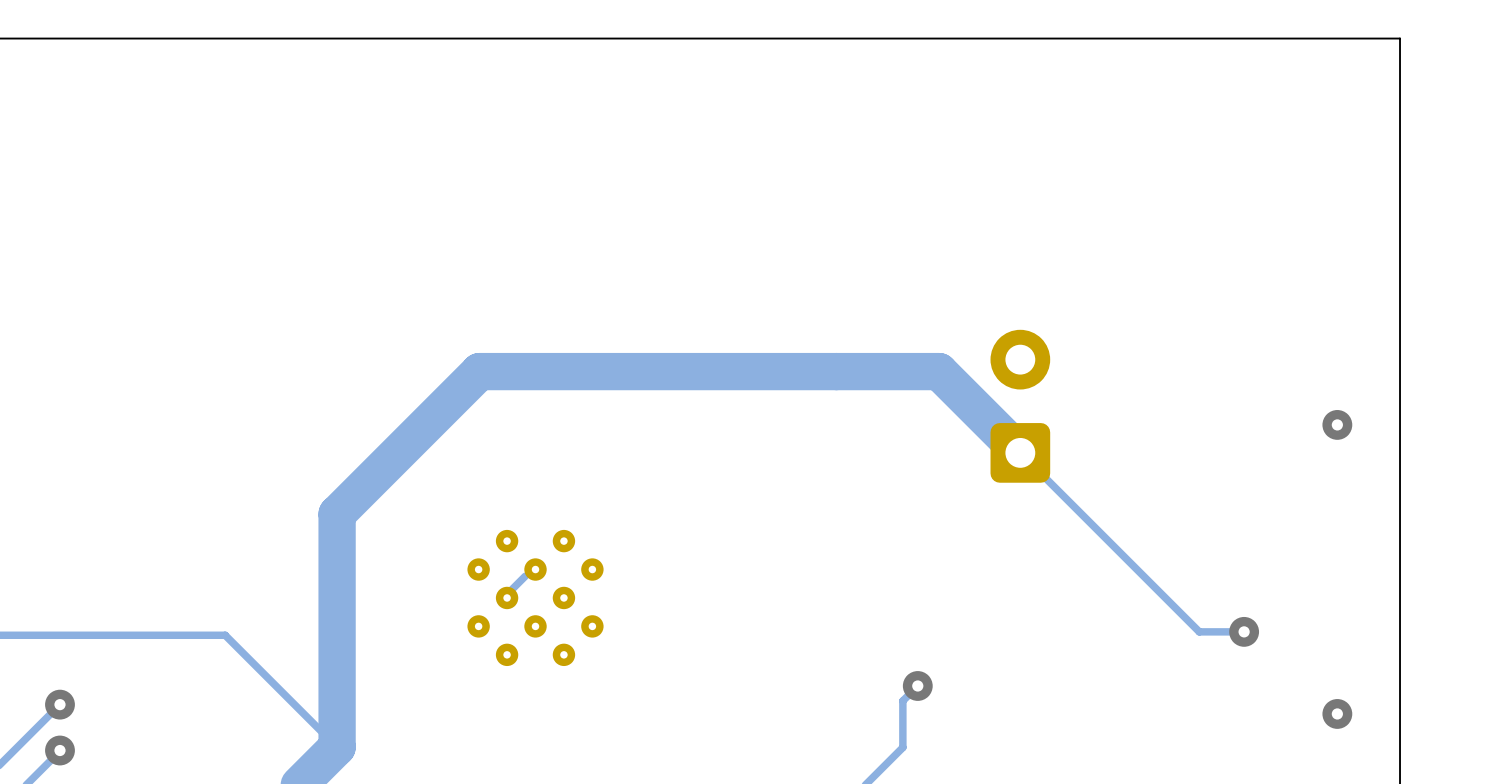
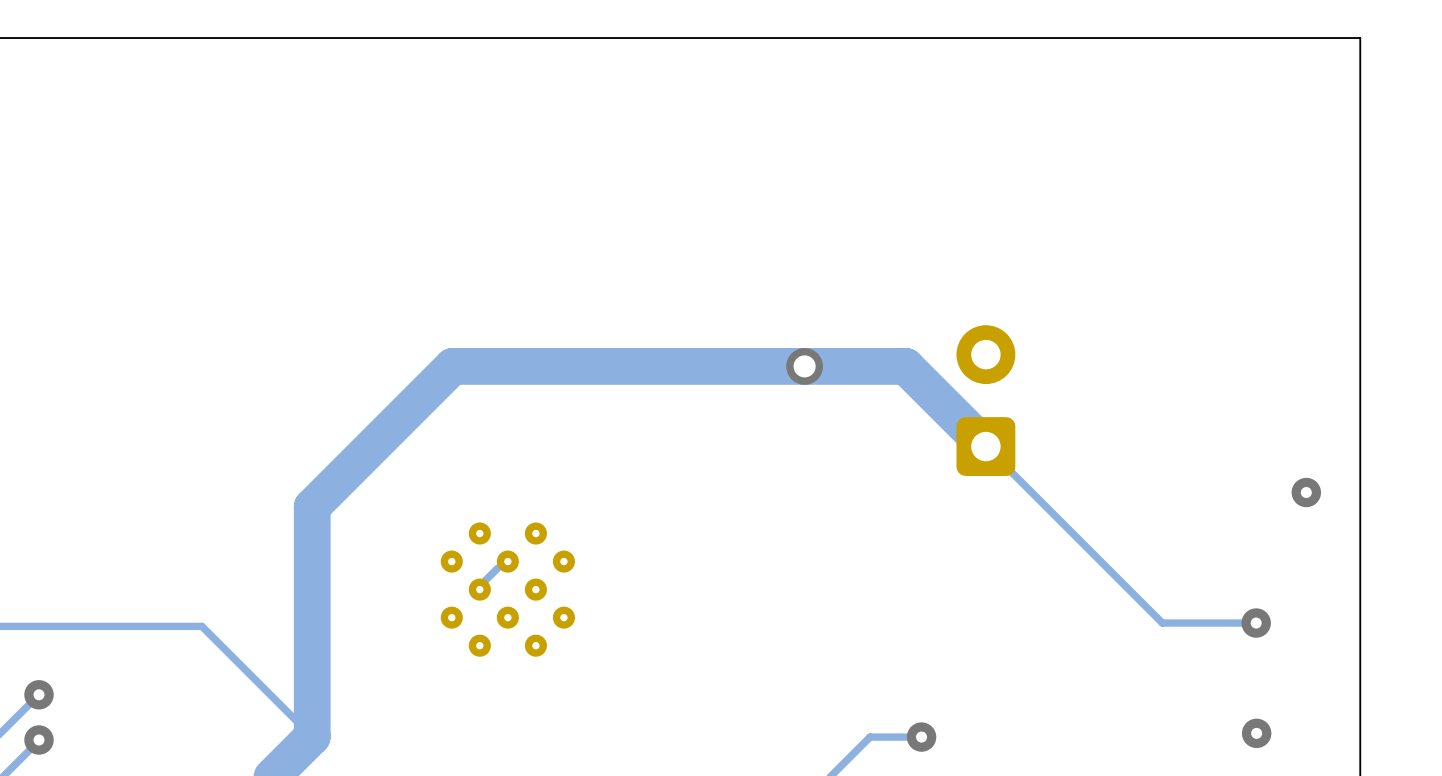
via: none -> (804, 366)
via position: (1337, 424) -> (1306, 492)
via: (1244, 631) -> none
track: none -> (1256, 623) (1206, 623)
via: none -> (1256, 623)
track: (917, 685) (902, 700) (902, 747) -> (921, 737) (870, 737)
via position: (917, 685) -> (921, 737)
via: (1337, 713) -> none
via: none -> (1256, 733)

